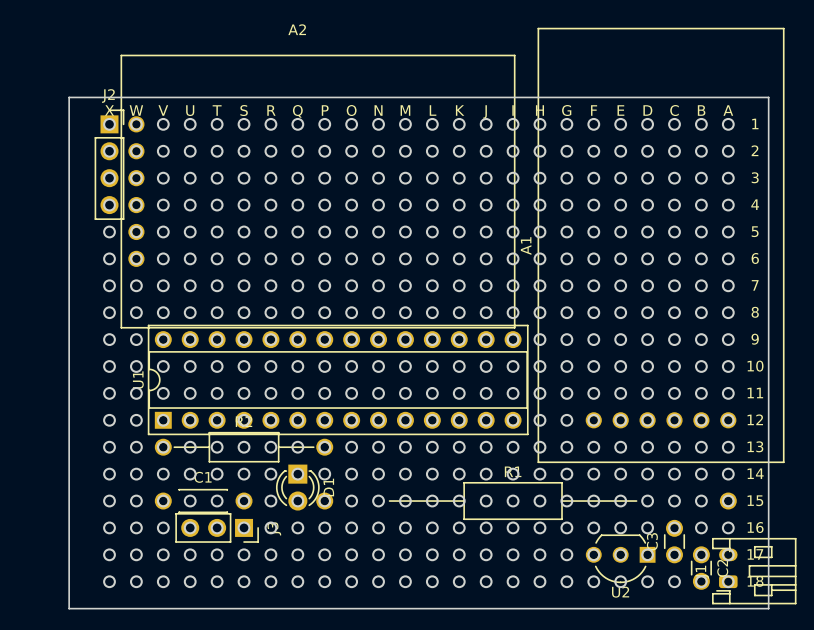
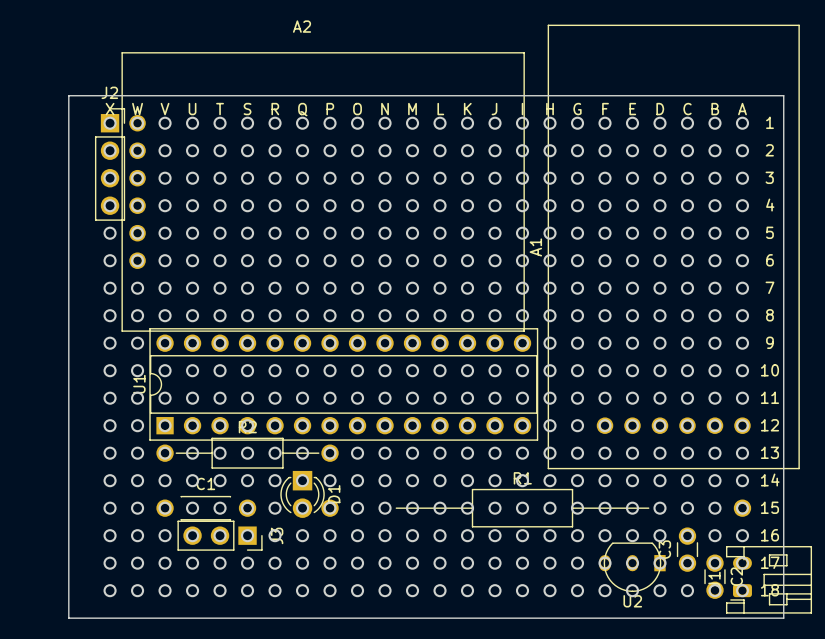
U2 footprint: [585, 534, 656, 584] -> [599, 542, 666, 592]

